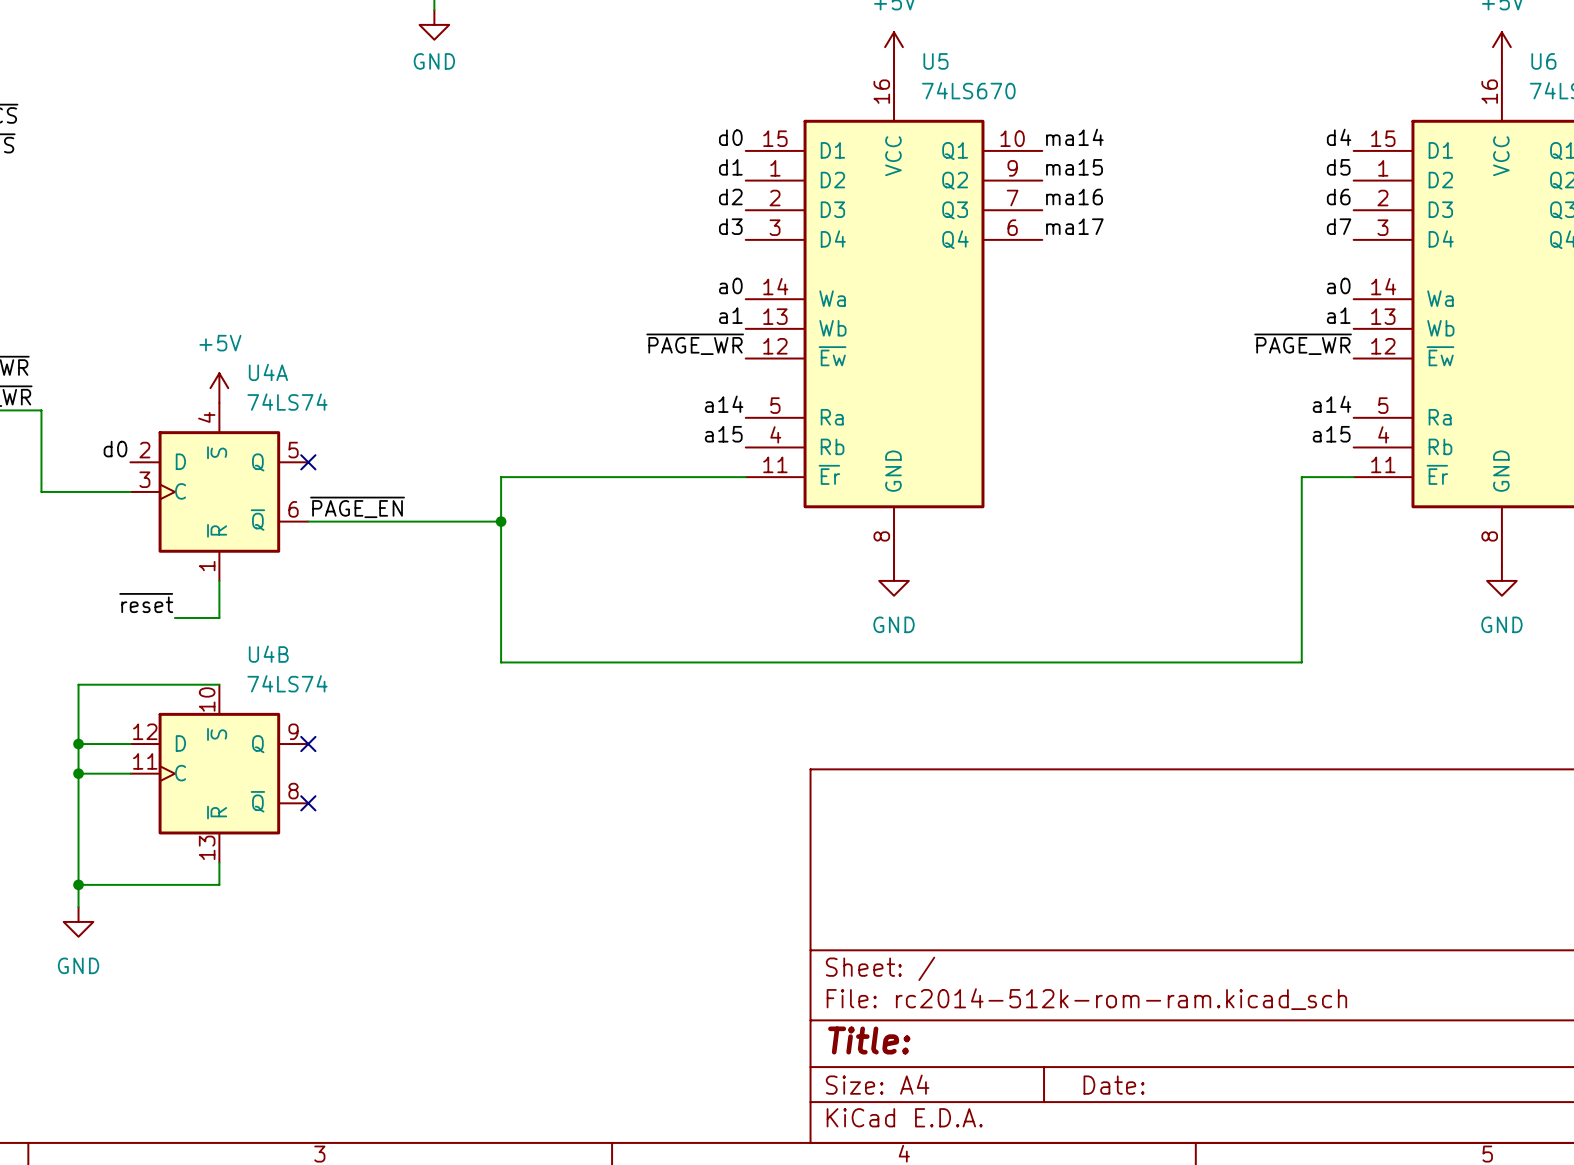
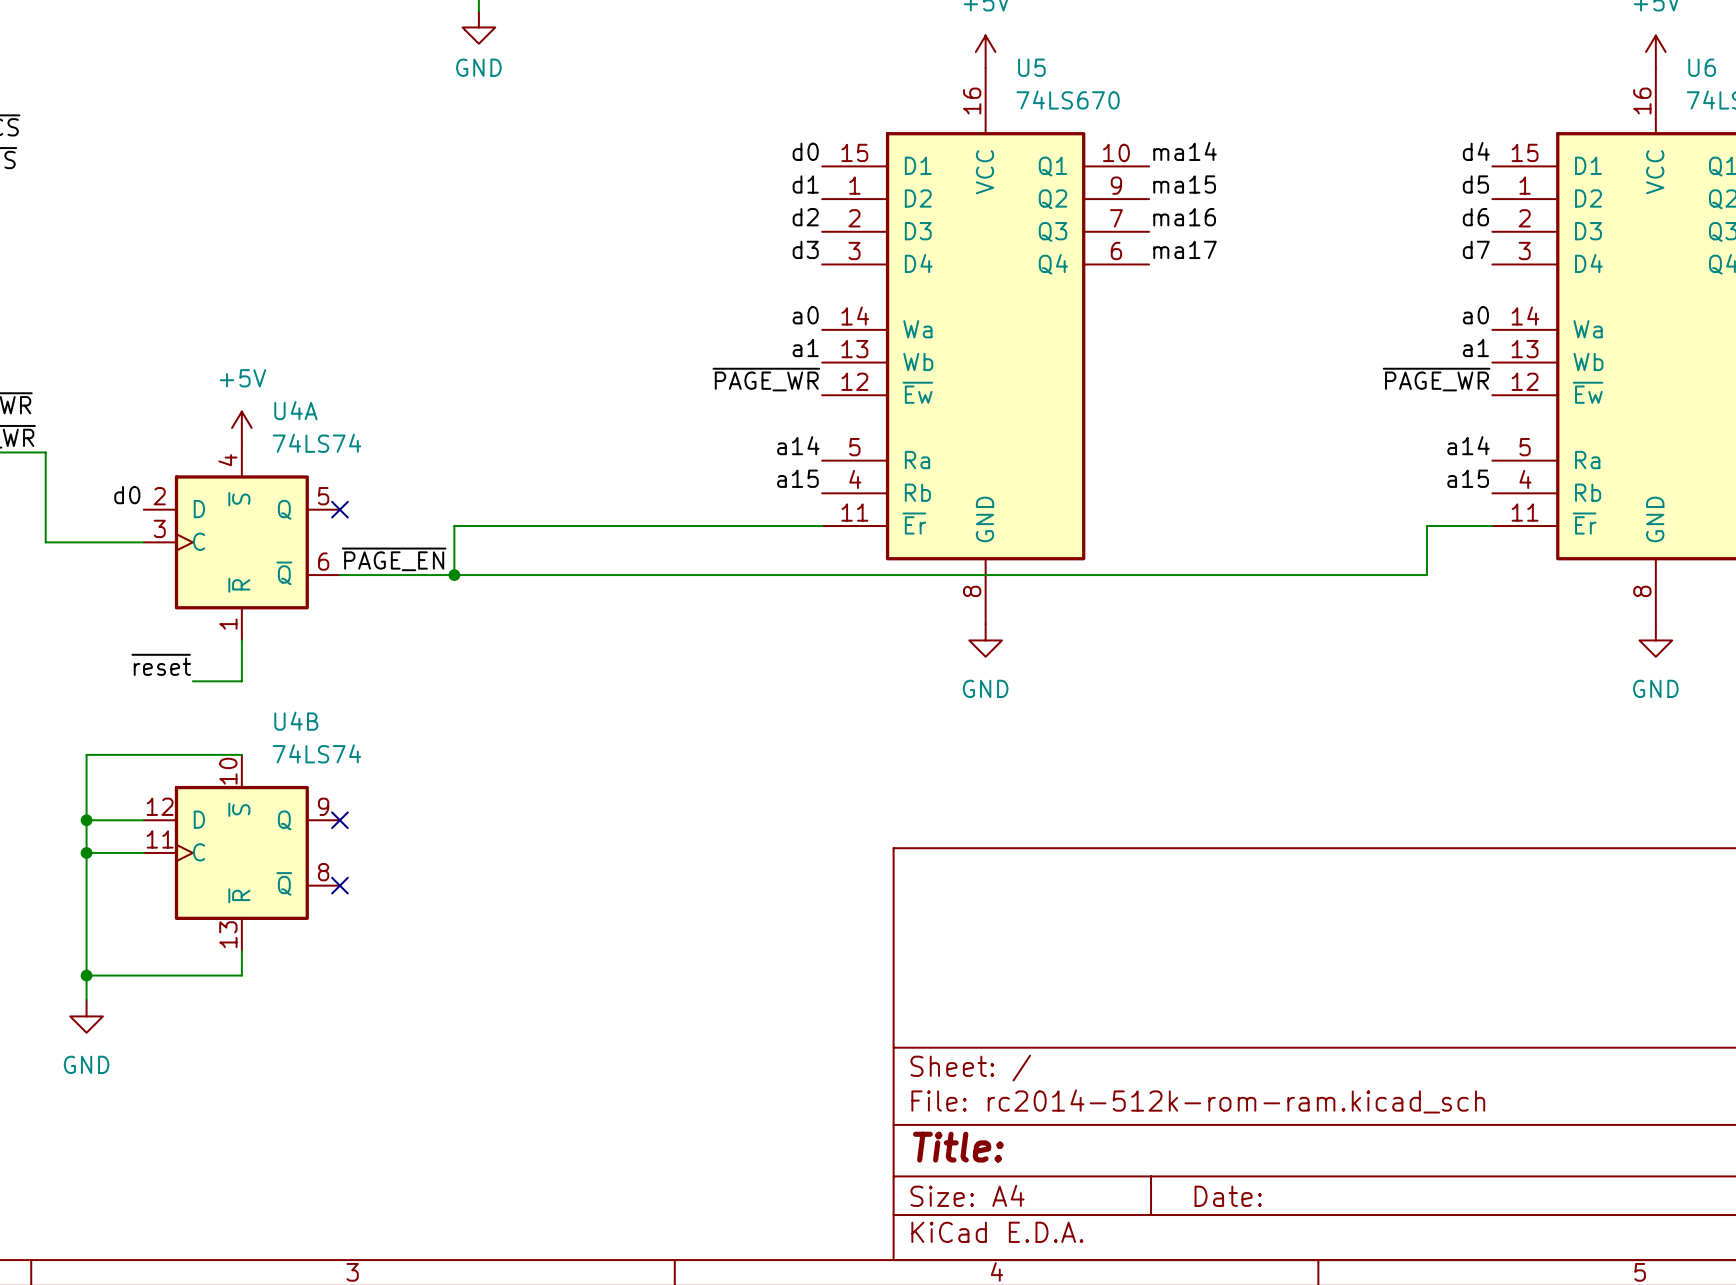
wire: (501, 477) (501, 662) (1301, 662) (1301, 477) -> (552, 575) (1426, 575) (1426, 526) (1435, 526)
wire: none -> (552, 526) (454, 526) (454, 575)
junction: none -> (454, 575)
junction: (501, 521) -> none

